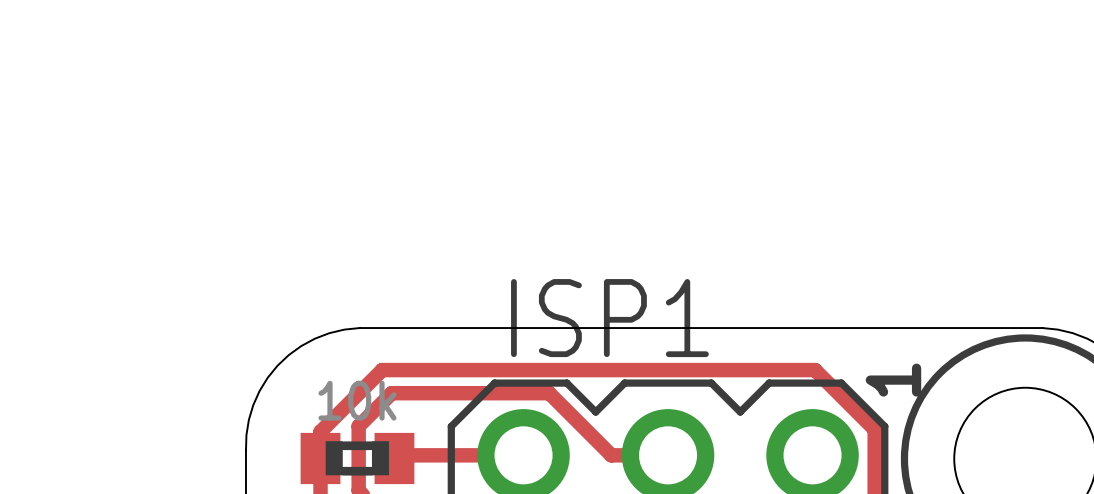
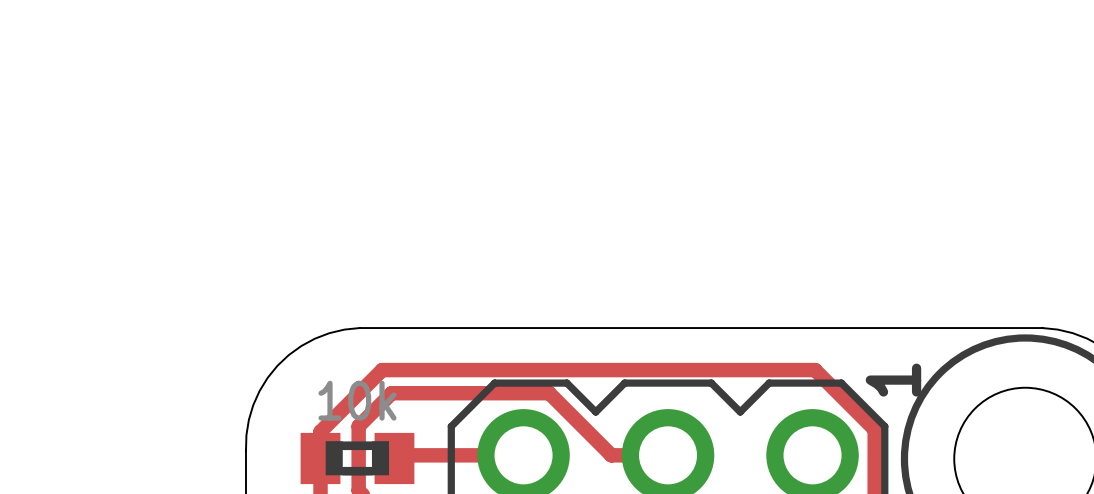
ISP1 name: ISP1 (609, 318) -> none

